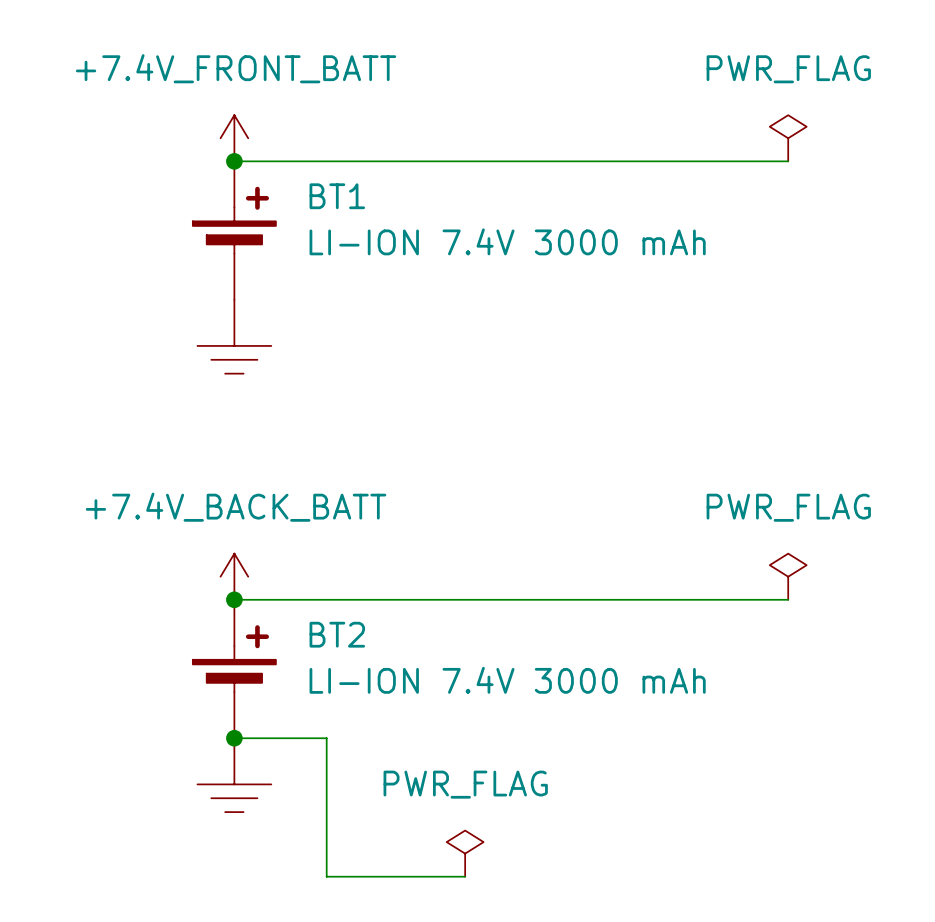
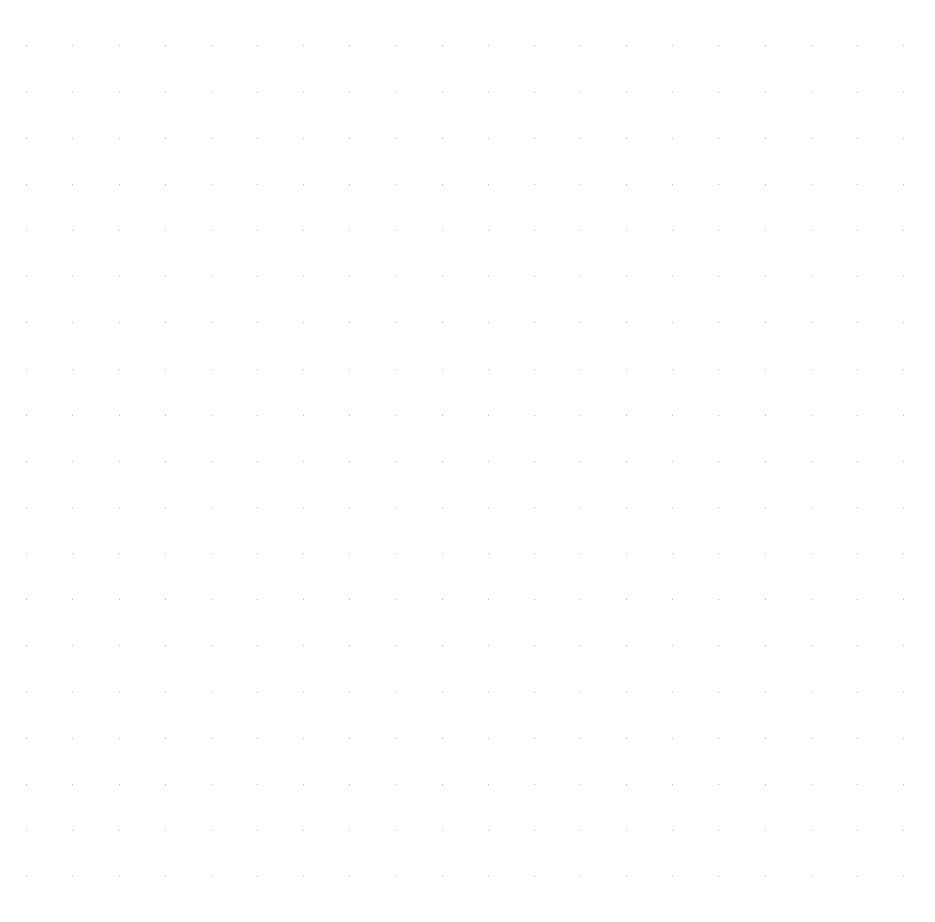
power symbol: +7.4V_FRONT_BATT (234, 138) -> none
power symbol: PWR_FLAG (788, 138) -> none
wire: (234, 161) (788, 161) -> none
junction: (234, 161) -> none
BT1: LI-ION 7.4V 3000 mAh (234, 230) -> none
power symbol: (234, 336) -> none
power symbol: +7.4V_BACK_BATT (234, 576) -> none
power symbol: PWR_FLAG (788, 576) -> none
wire: (234, 599) (788, 599) -> none
junction: (234, 599) -> none
BT2: LI-ION 7.4V 3000 mAh (234, 669) -> none
wire: (234, 738) (326, 738) (326, 876) (465, 876) -> none
junction: (234, 738) -> none
power symbol: (234, 775) -> none
power symbol: PWR_FLAG (465, 853) -> none

